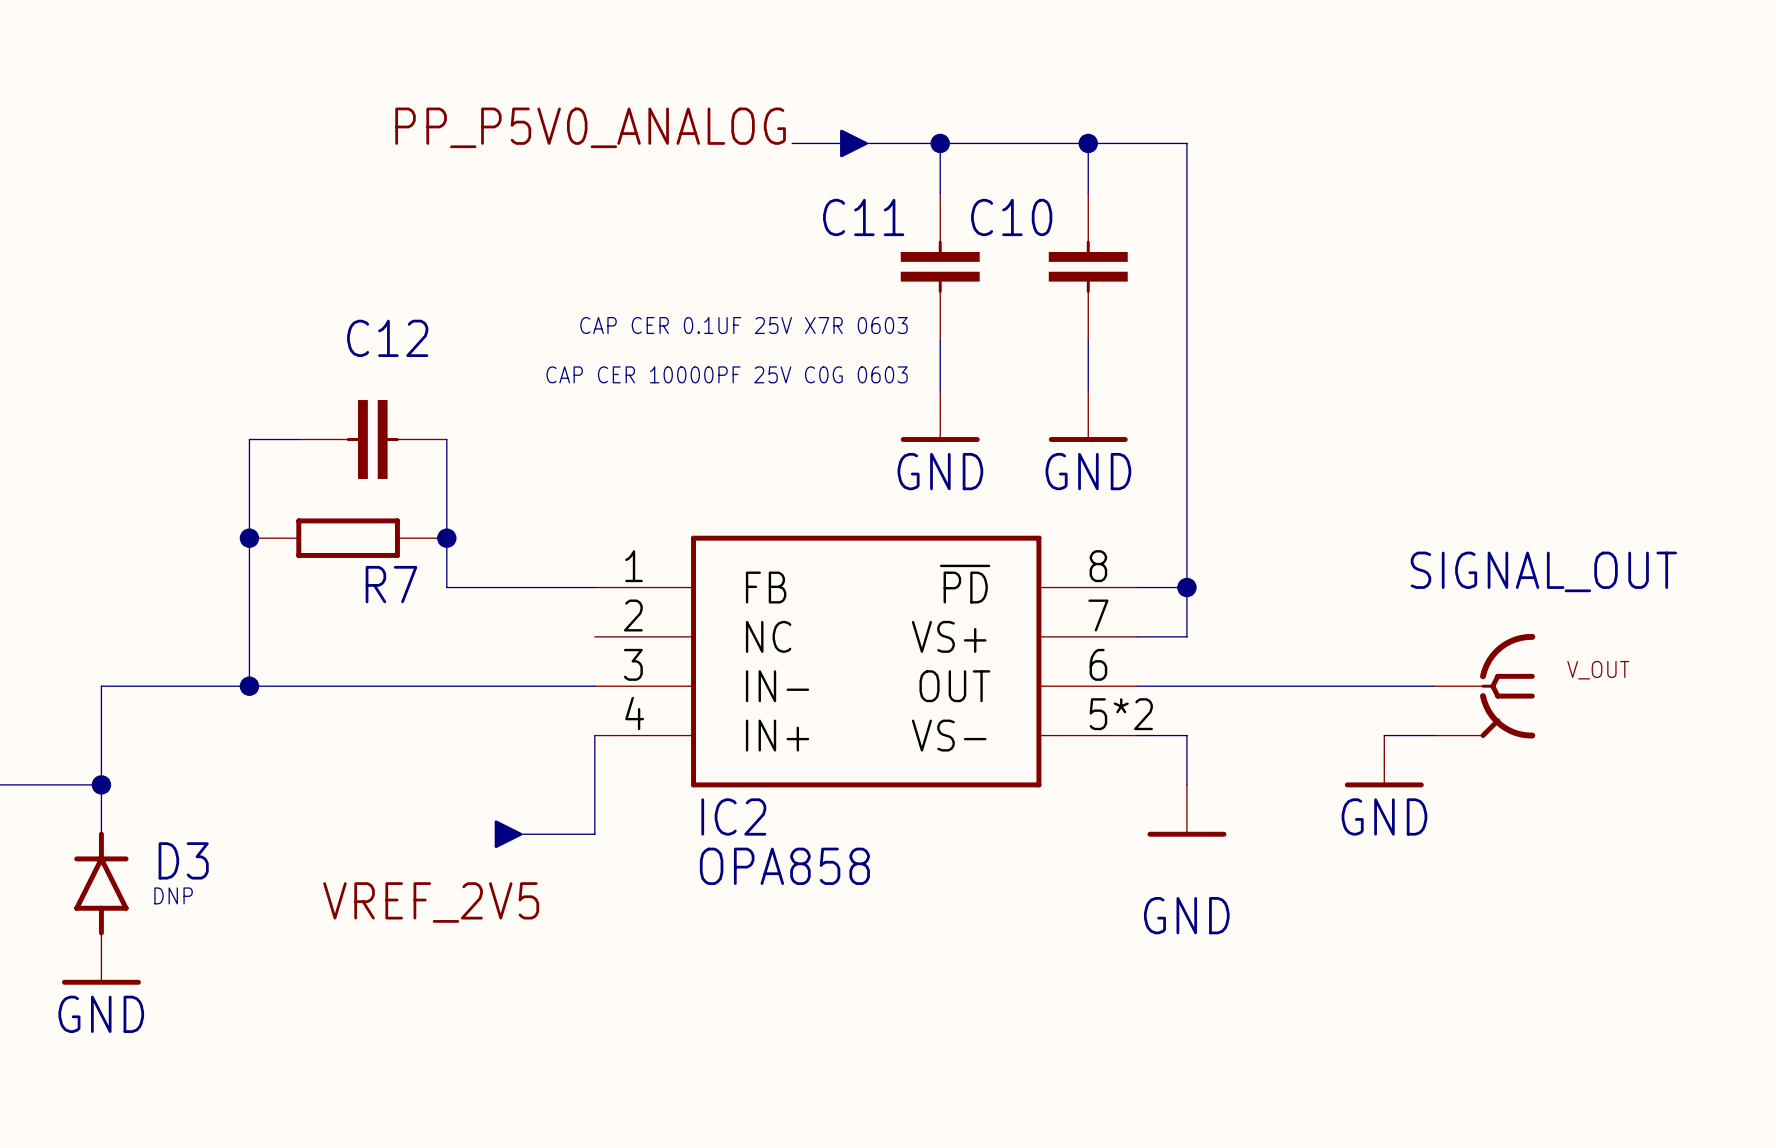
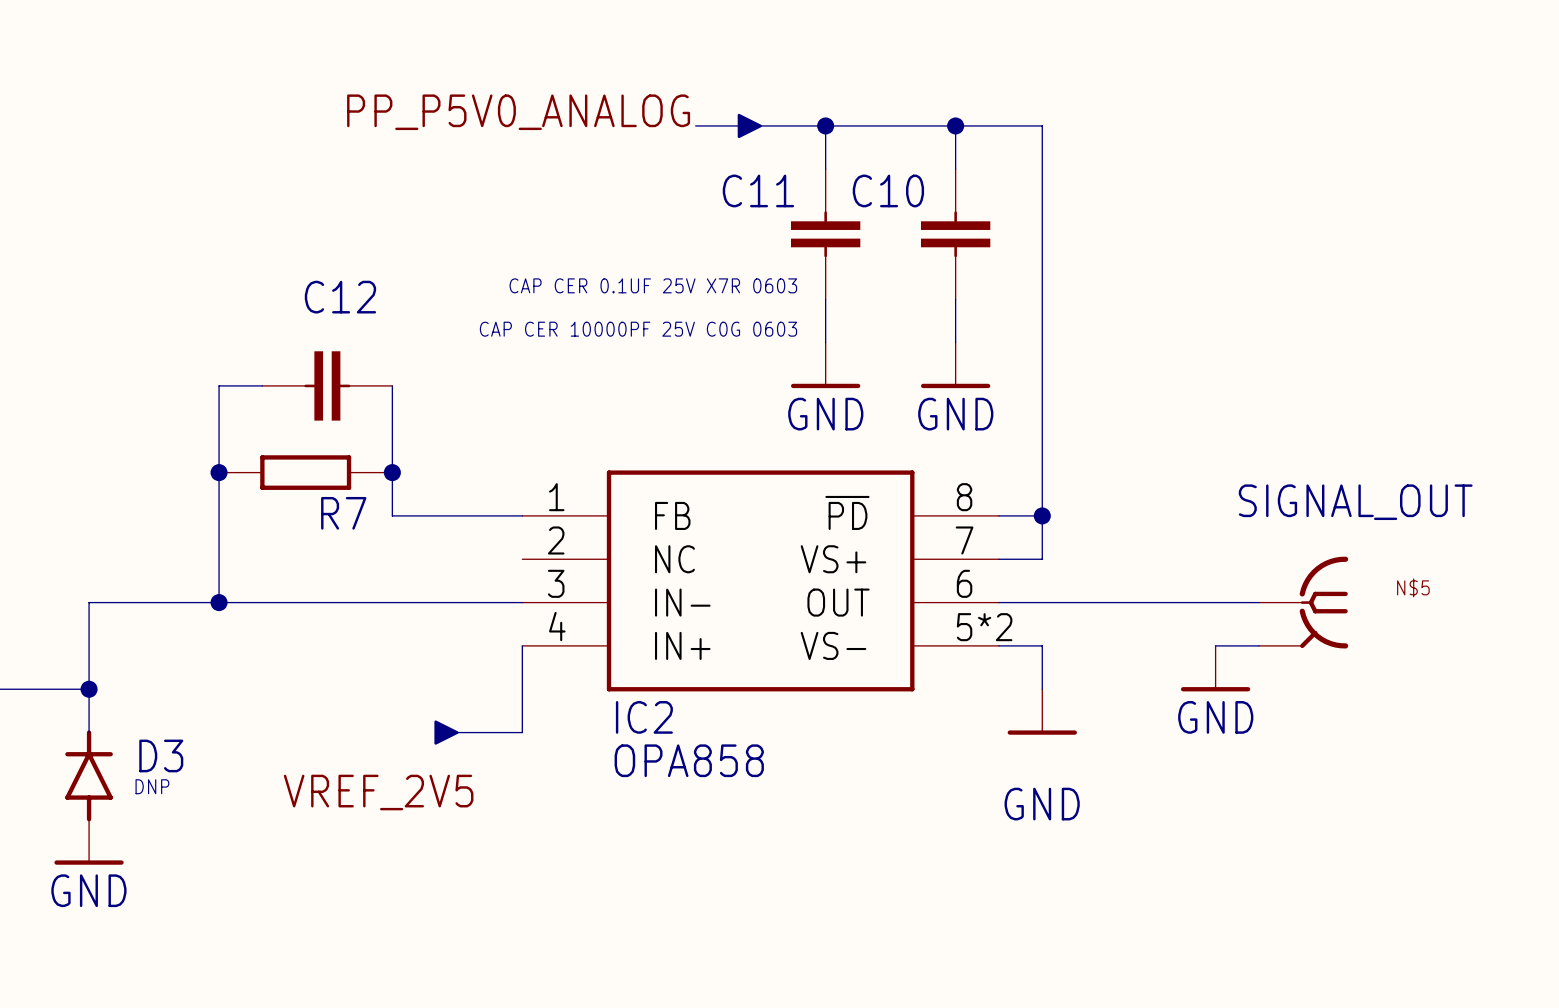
label: V_OUT (1598, 670) -> N$5 (1413, 587)

